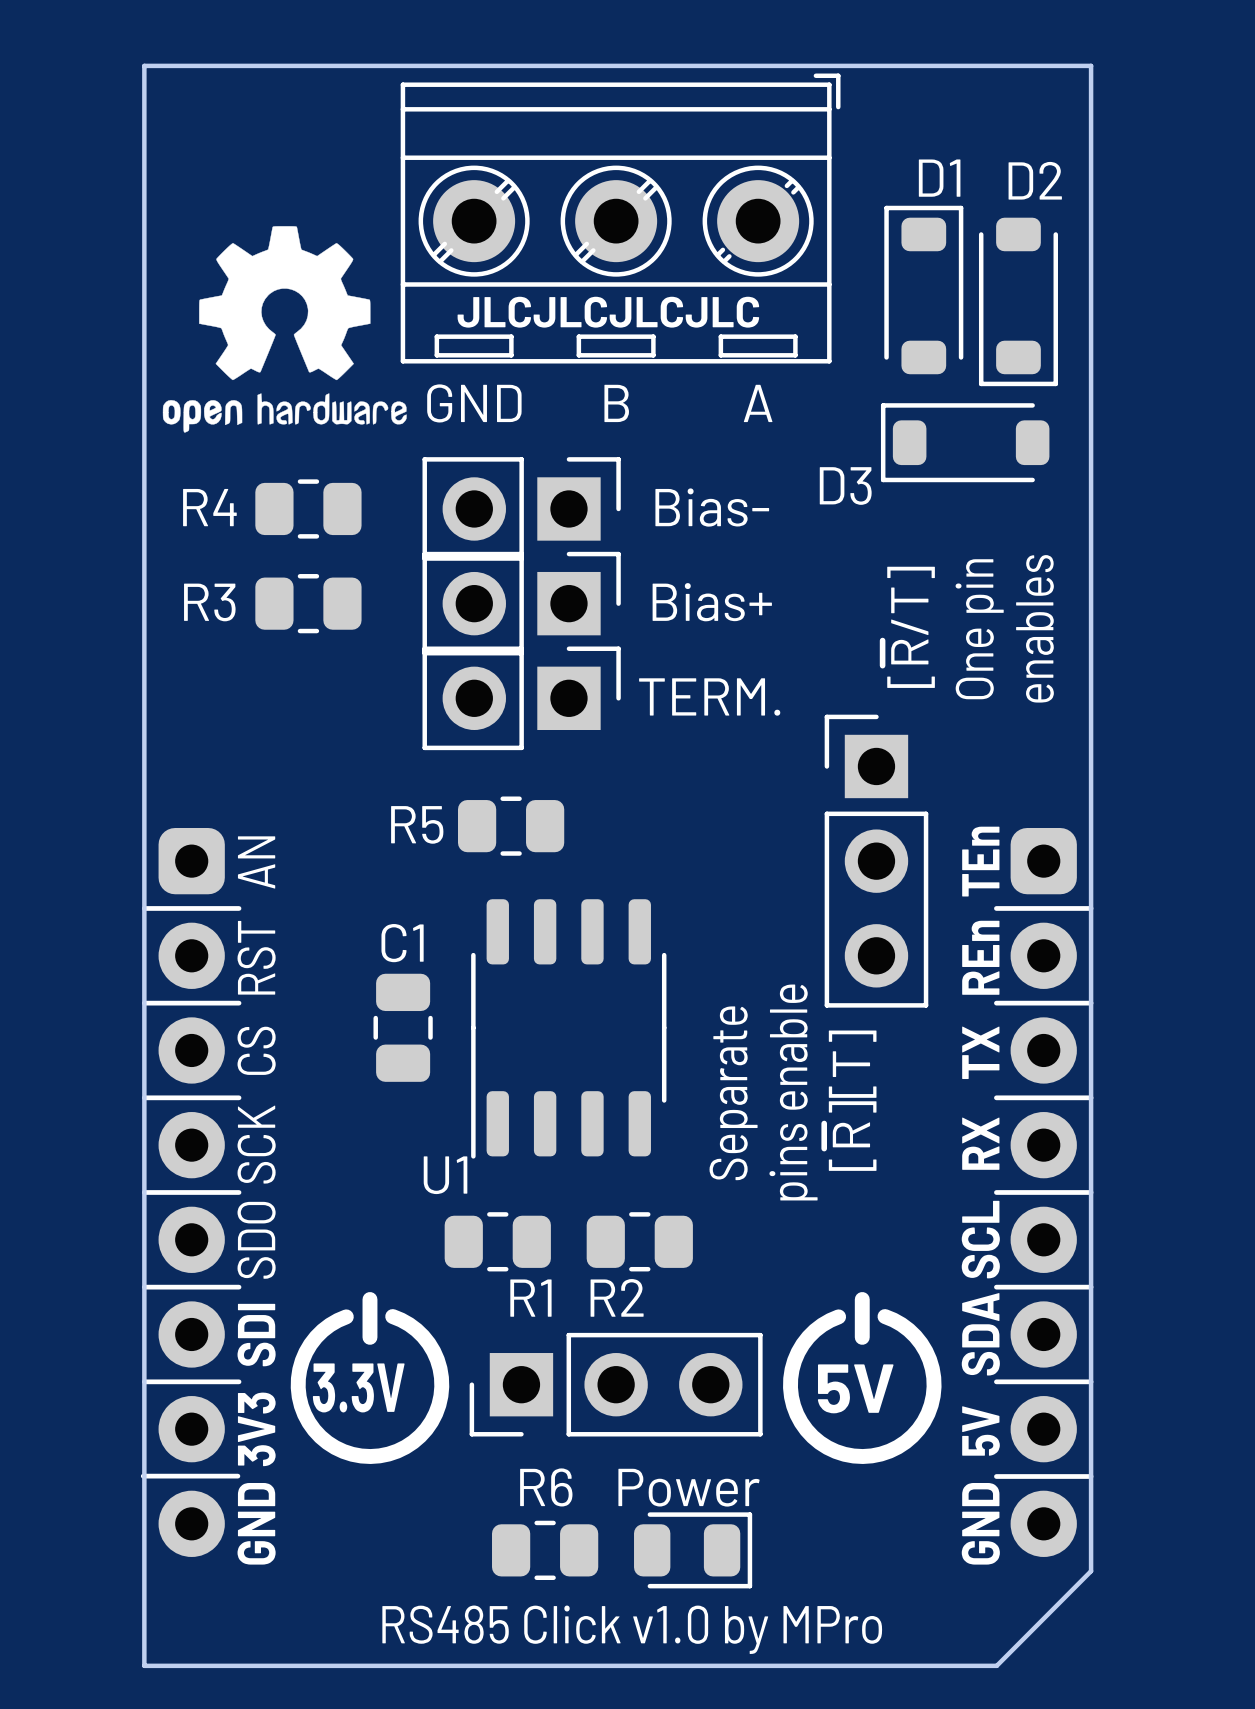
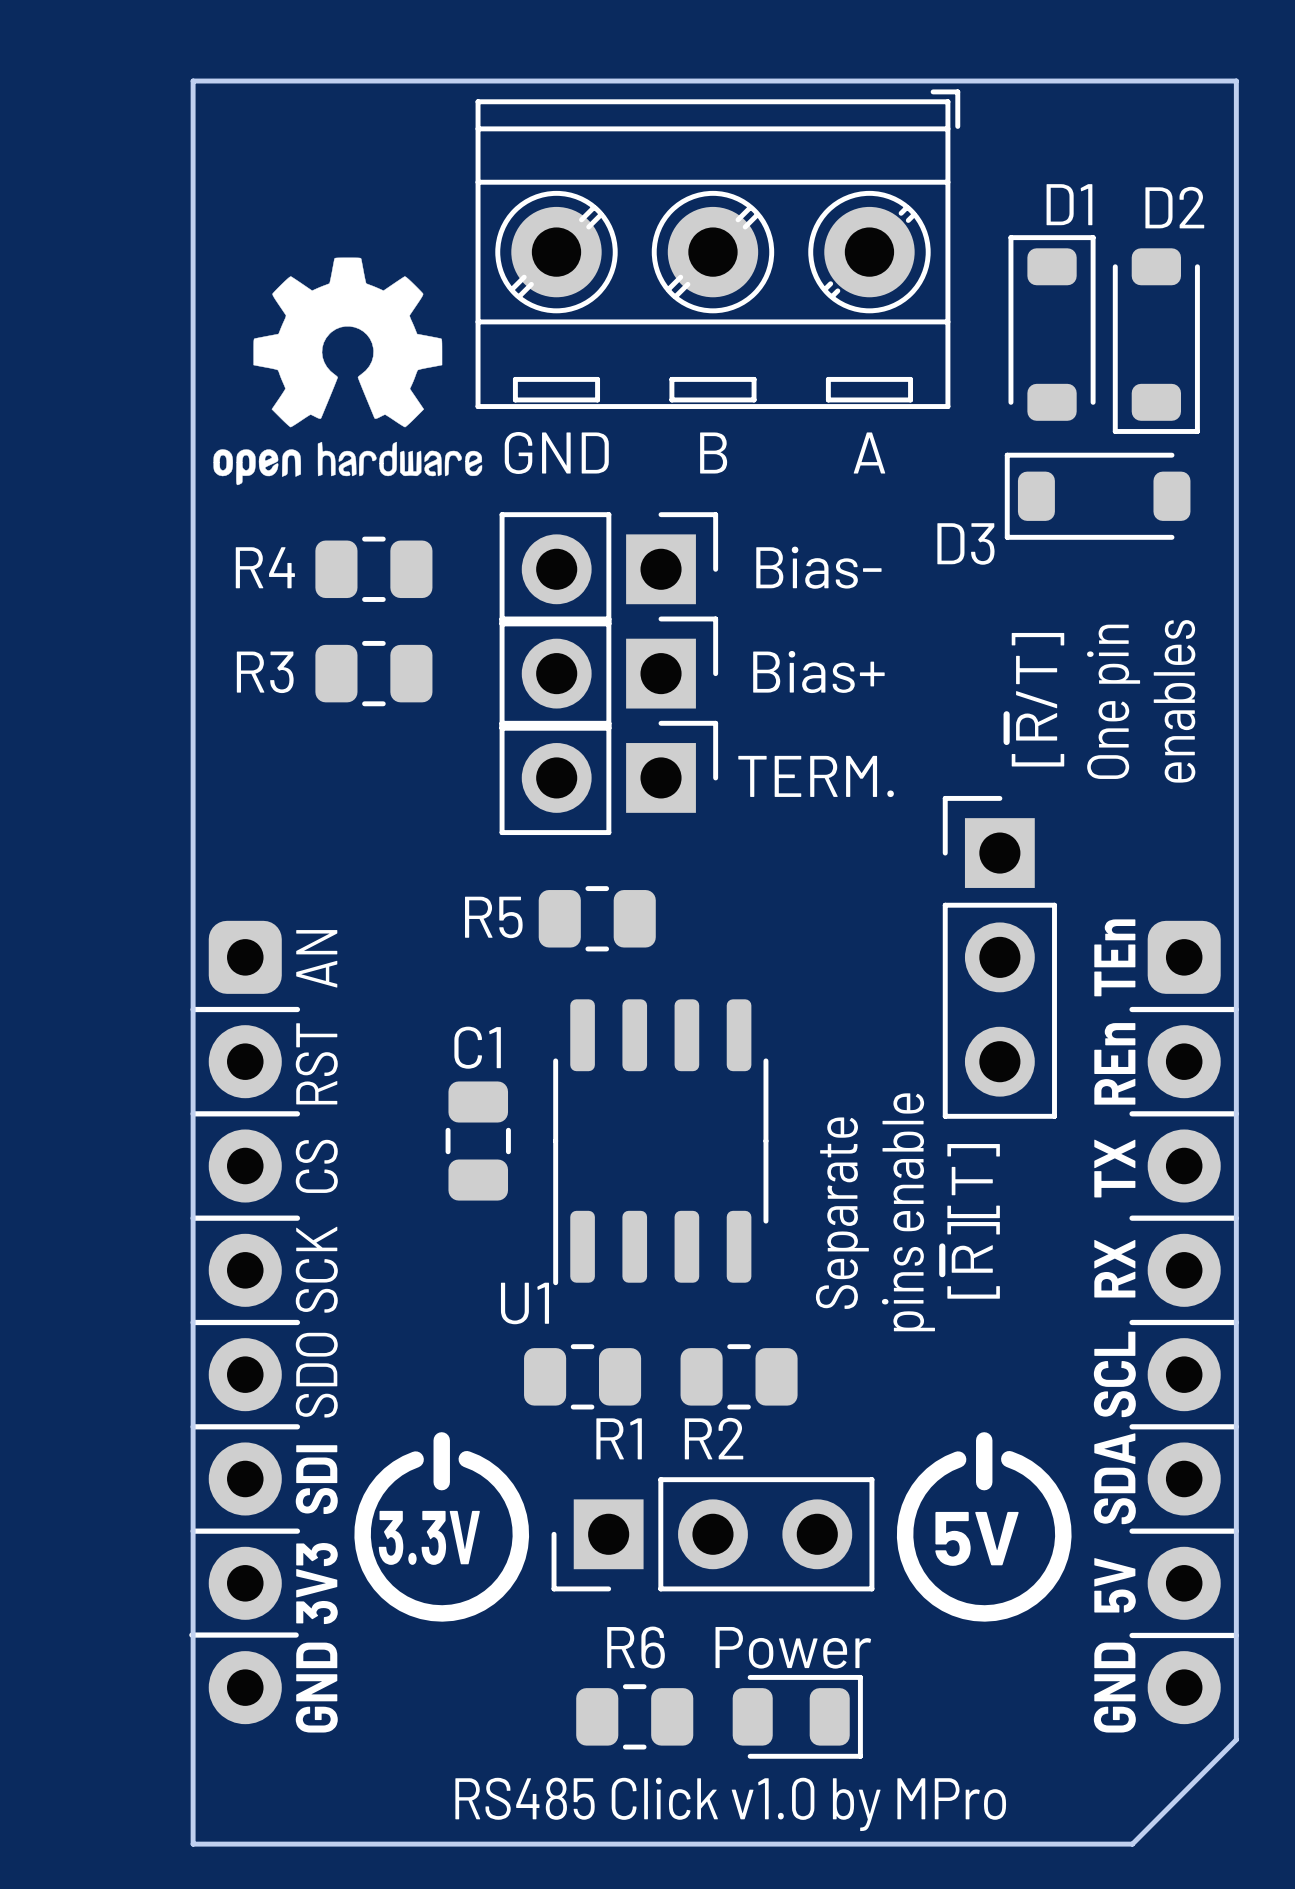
text: JLCJLCJLCJLC (608, 312) -> none

